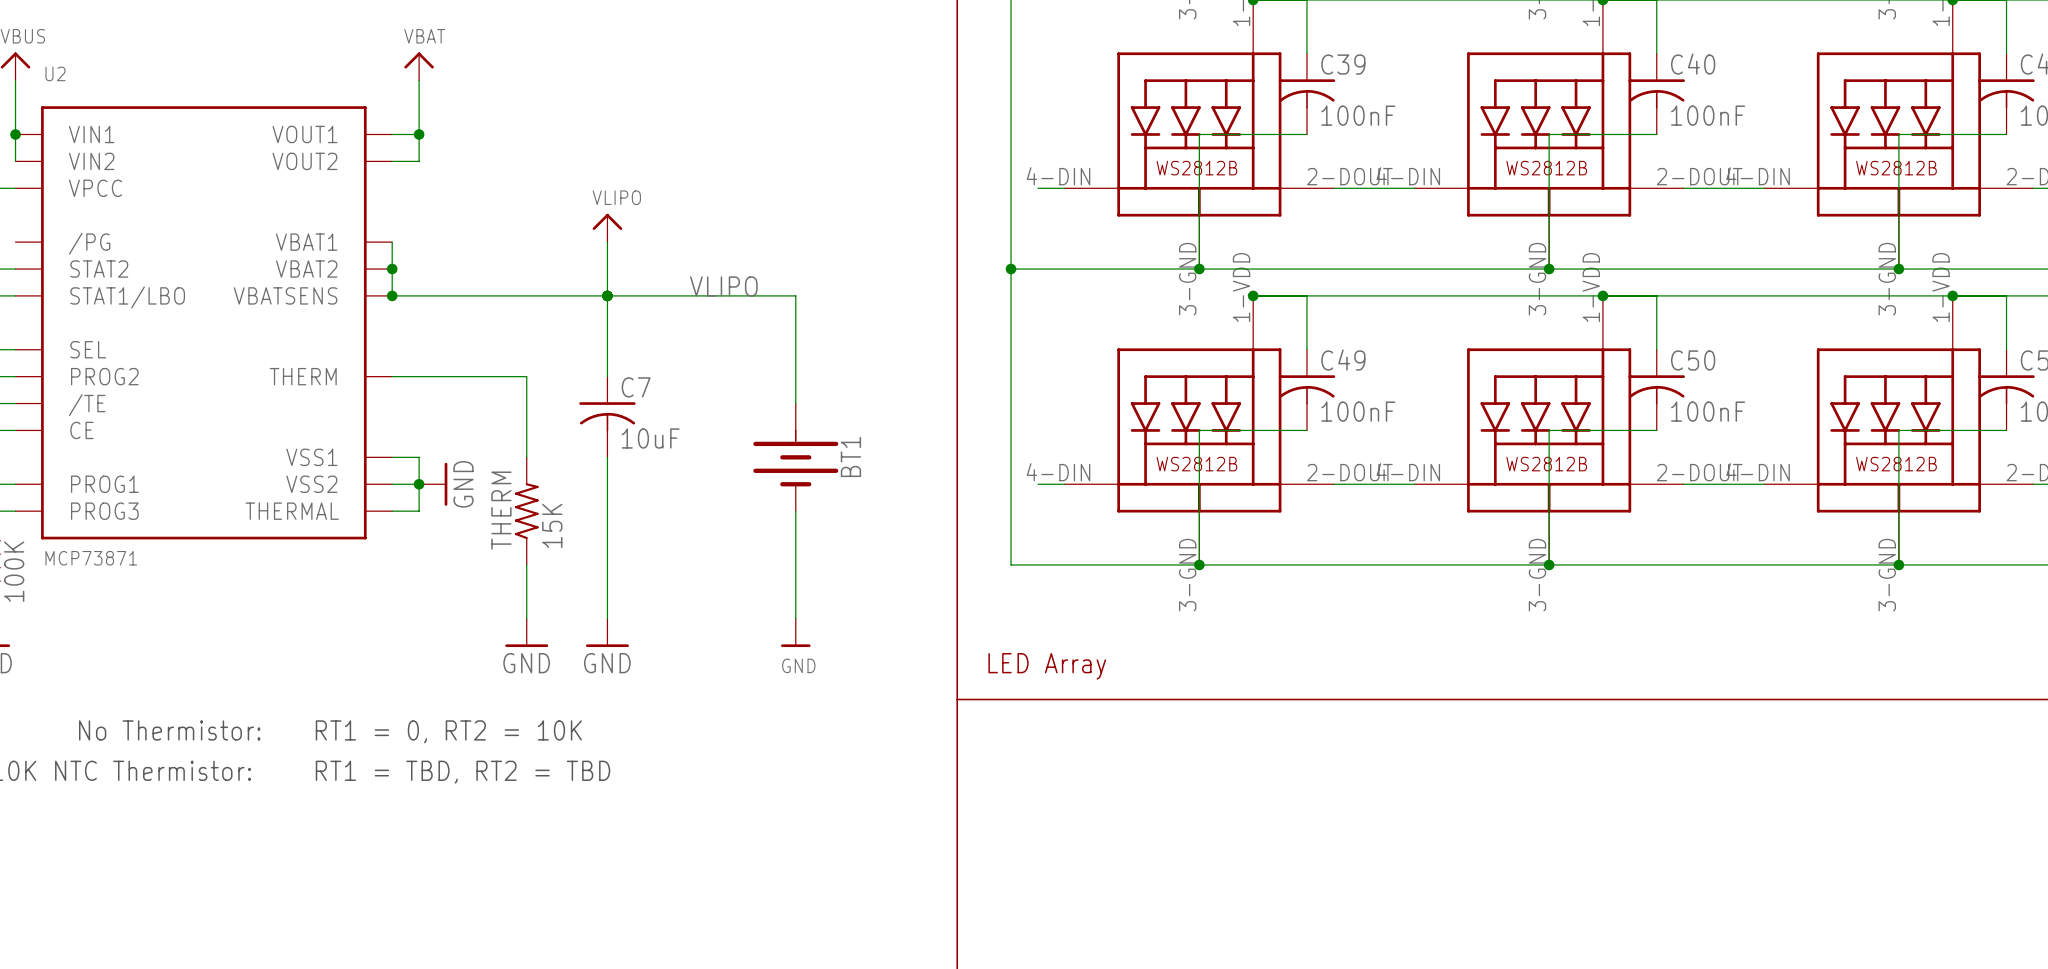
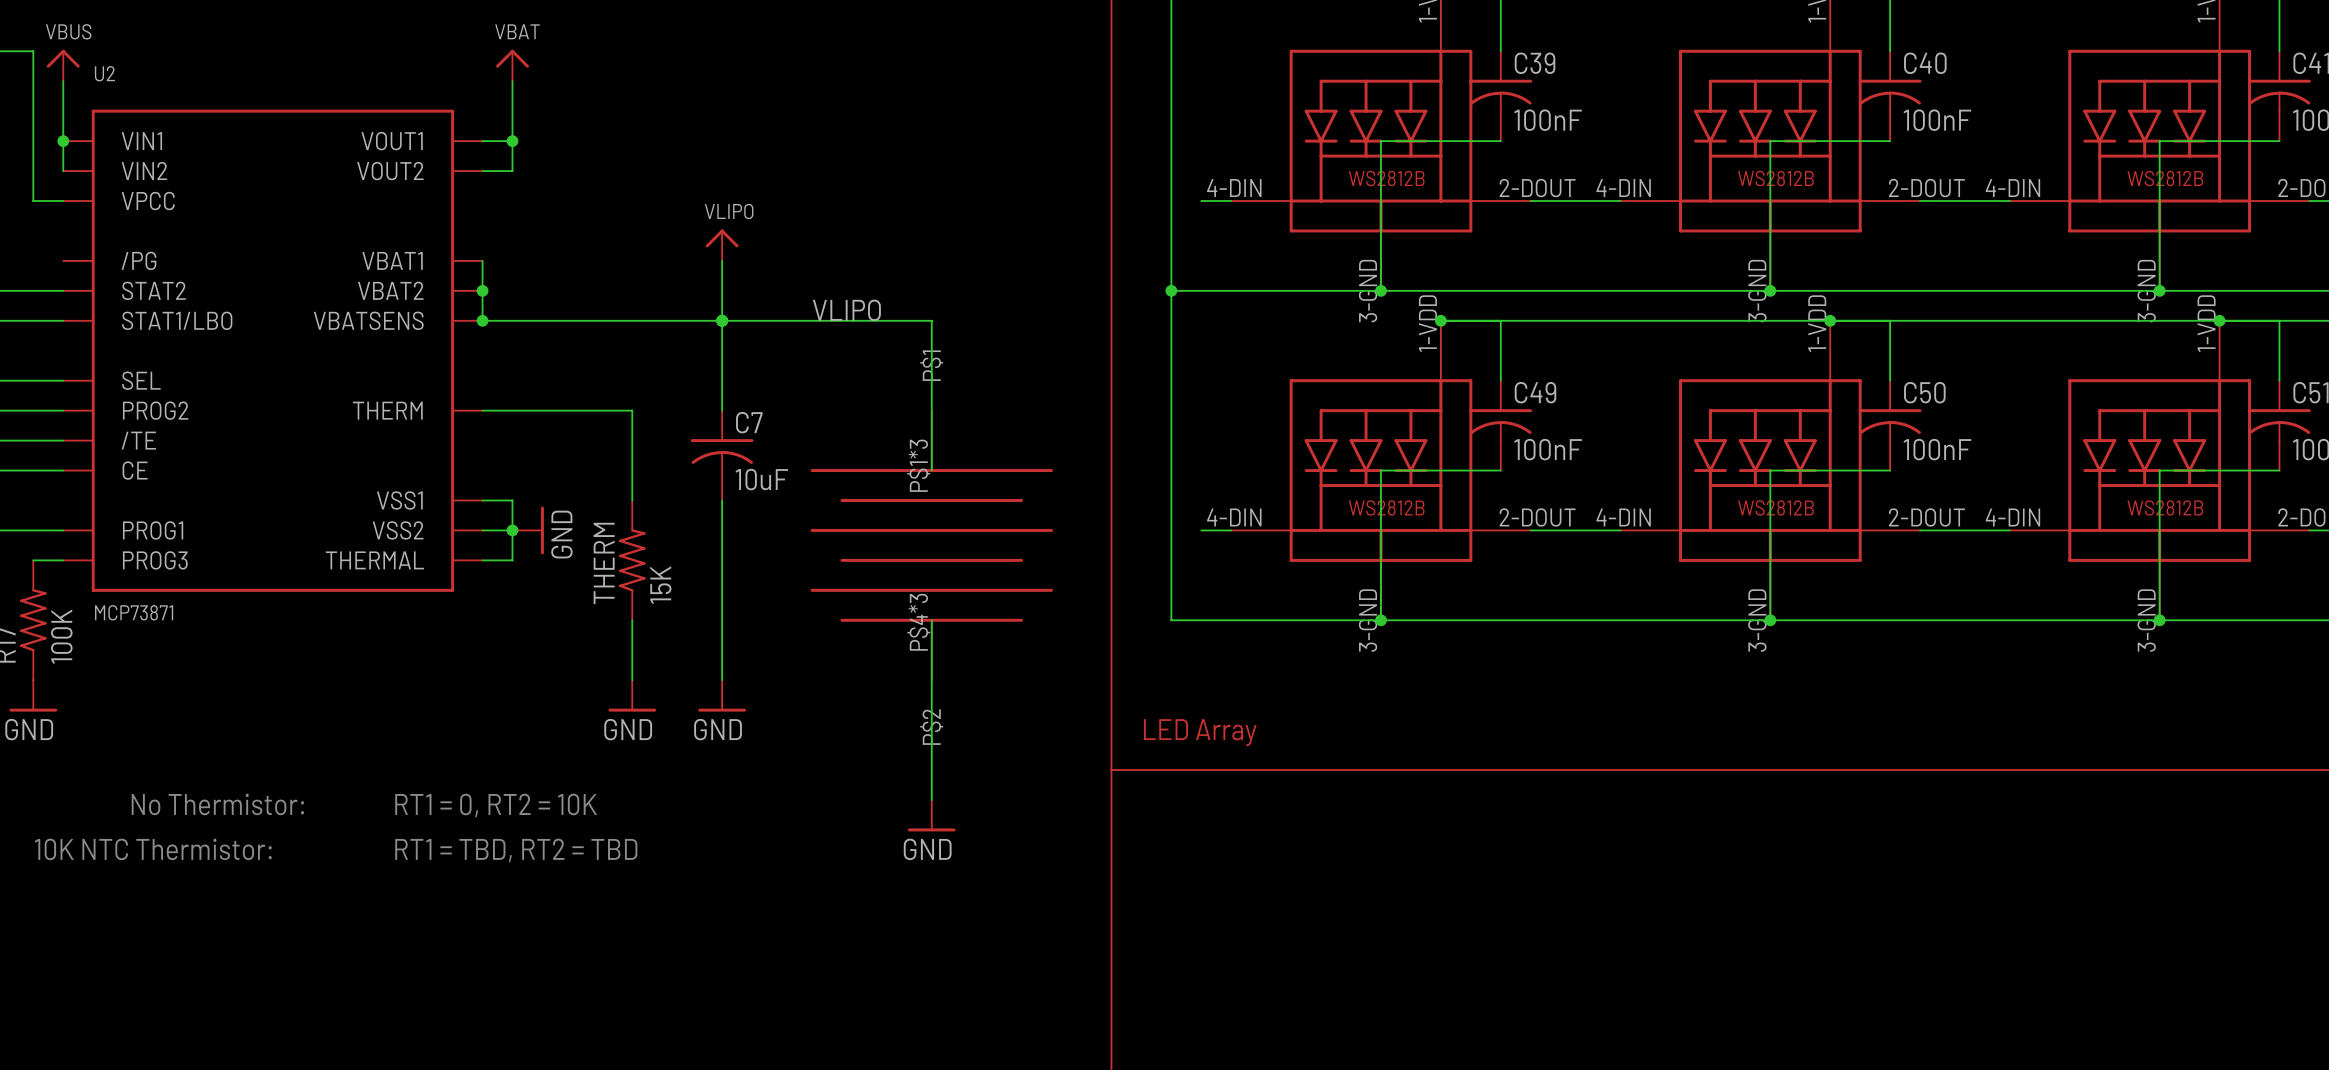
BT1: (795, 457) -> none
part: none -> (931, 545)
wire: (795, 511) (795, 564) -> none
wire: none -> (931, 680) (931, 799)
power symbol: GND (795, 632) -> none
power symbol: none -> GND (931, 815)

